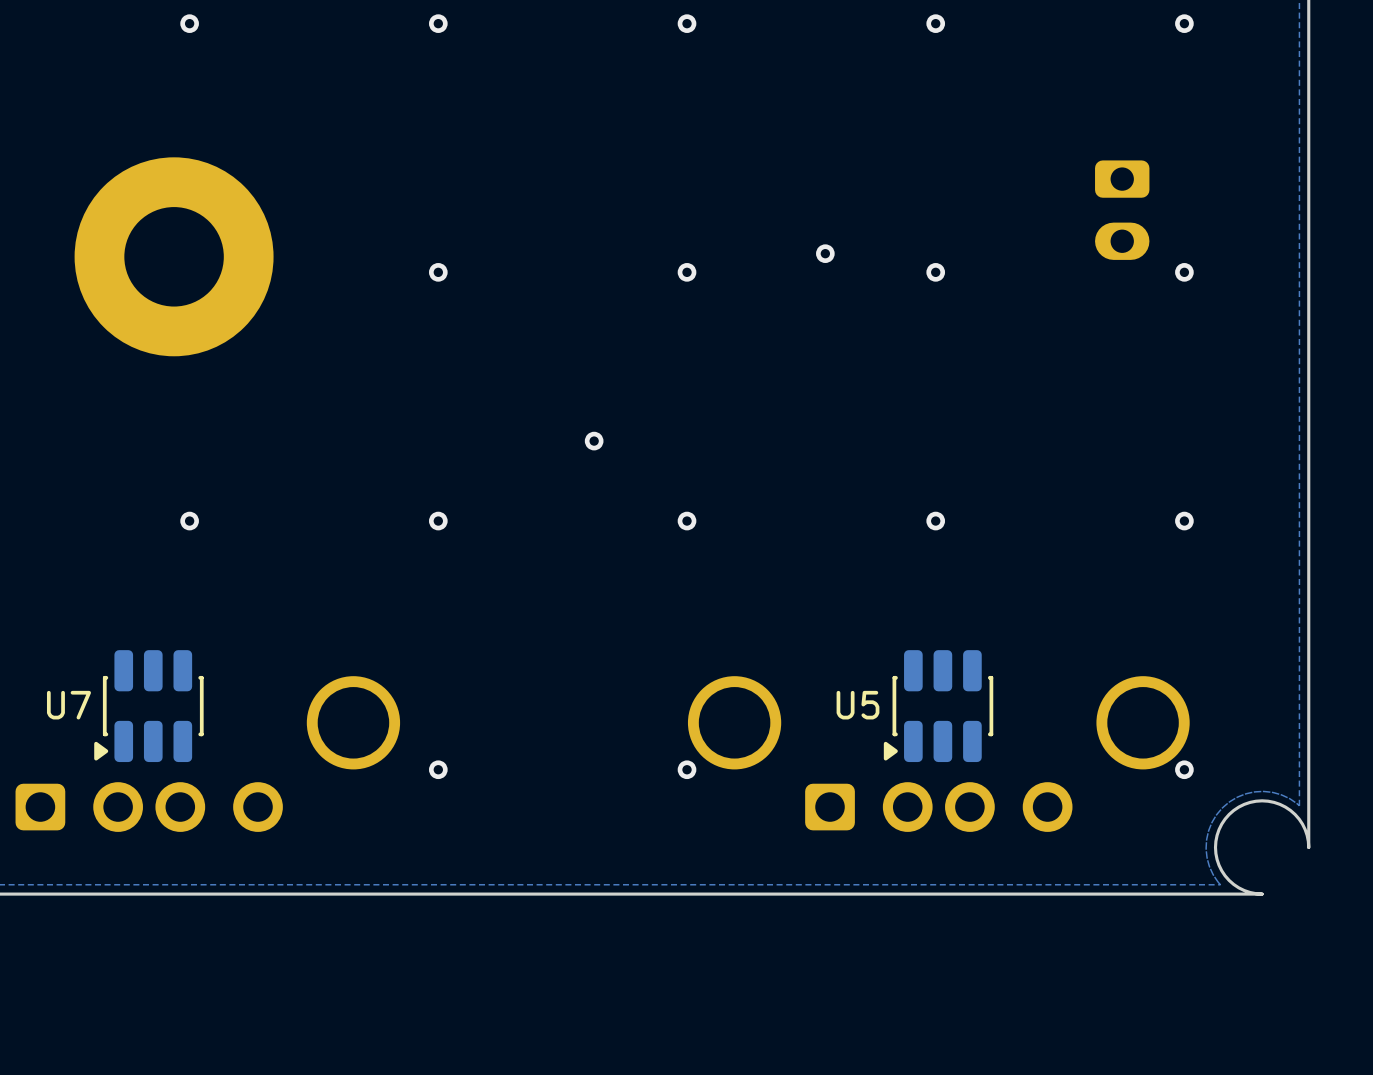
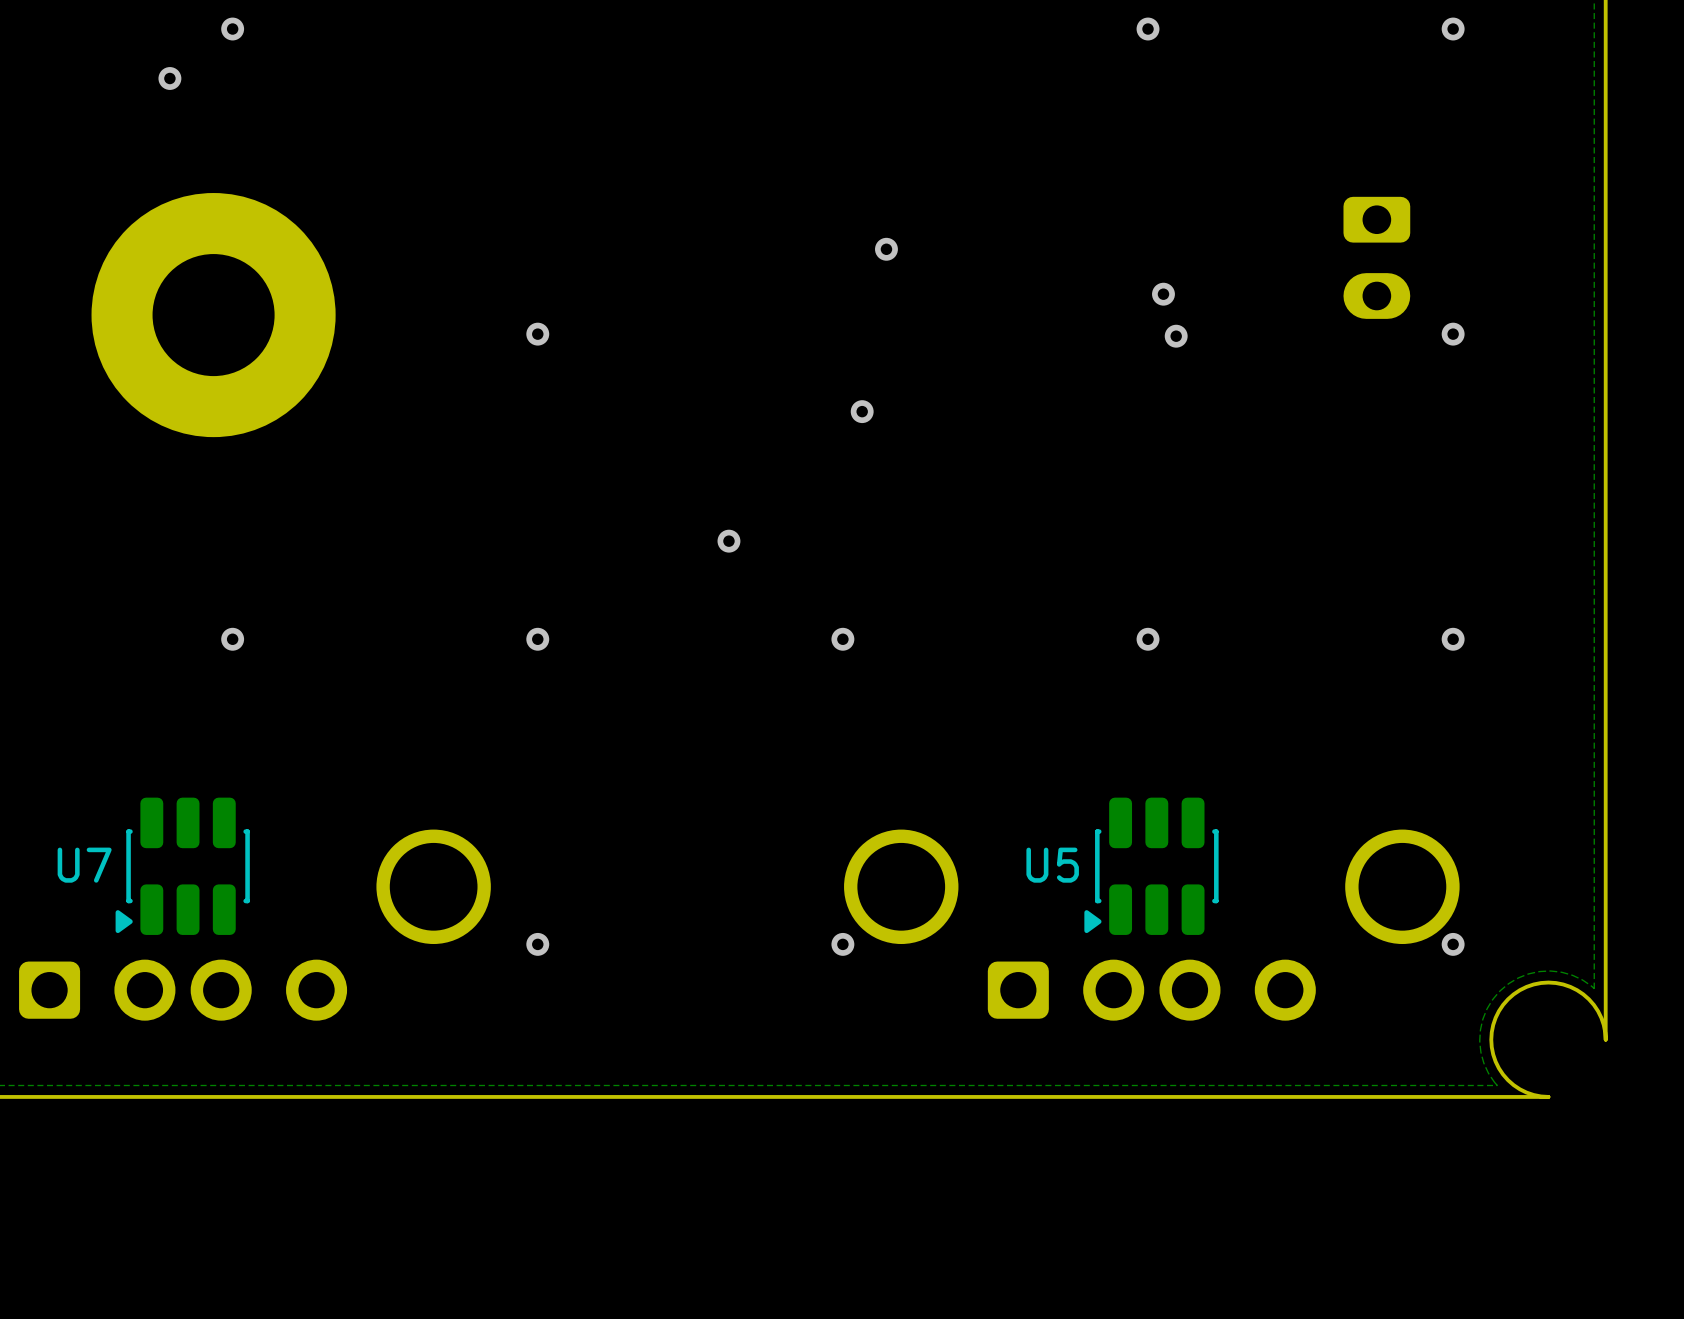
via: (438, 23) -> none
via: (687, 23) -> none
via: none -> (169, 78)
via: none -> (886, 249)
via: none -> (1163, 294)
via: (825, 253) -> none
via: (687, 272) -> none
via: (935, 272) -> none
via: none -> (1176, 336)
via: none -> (862, 411)

